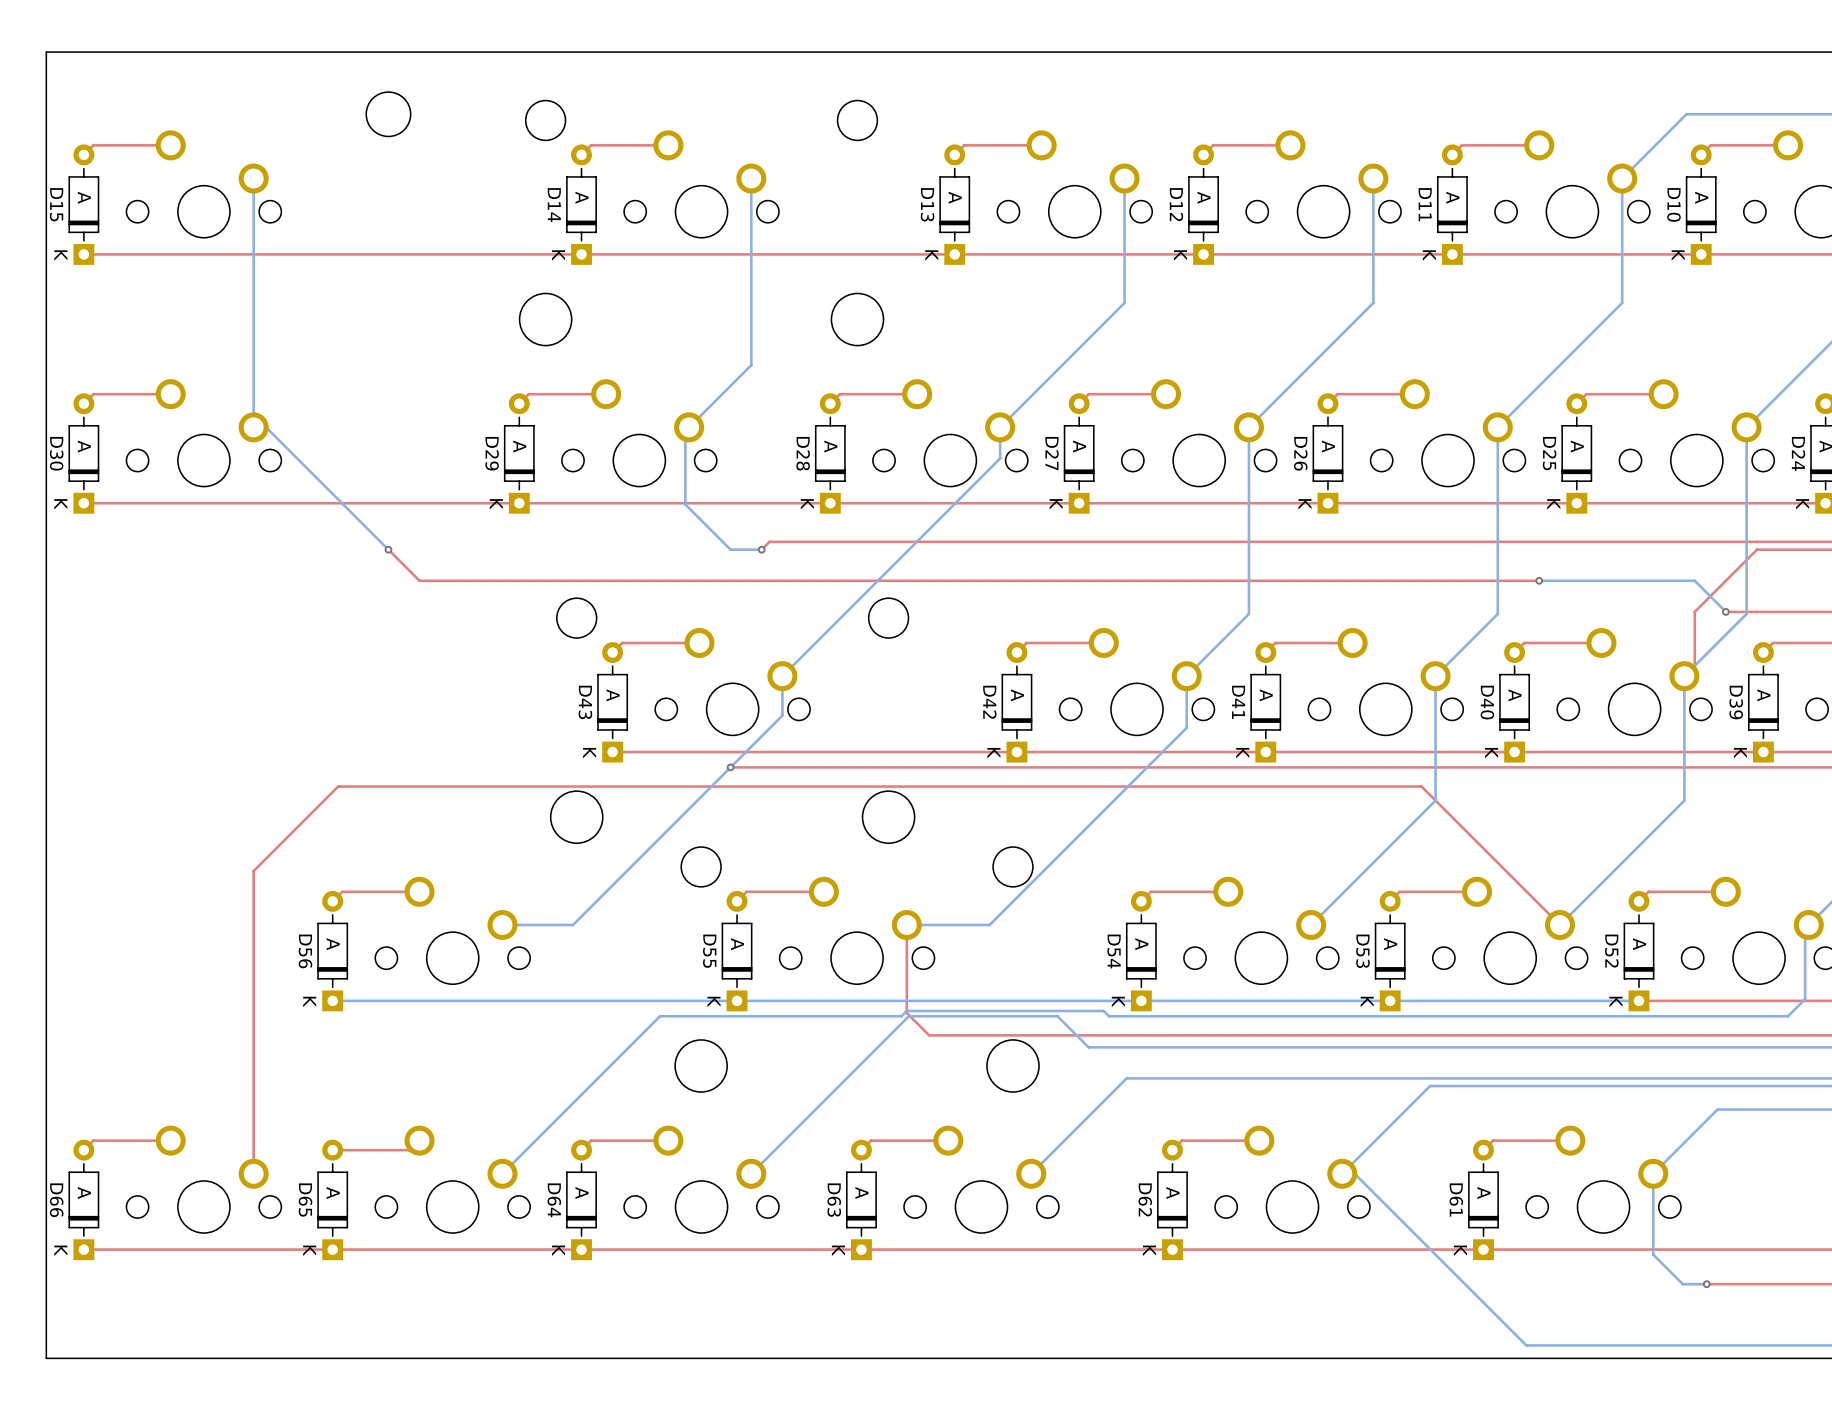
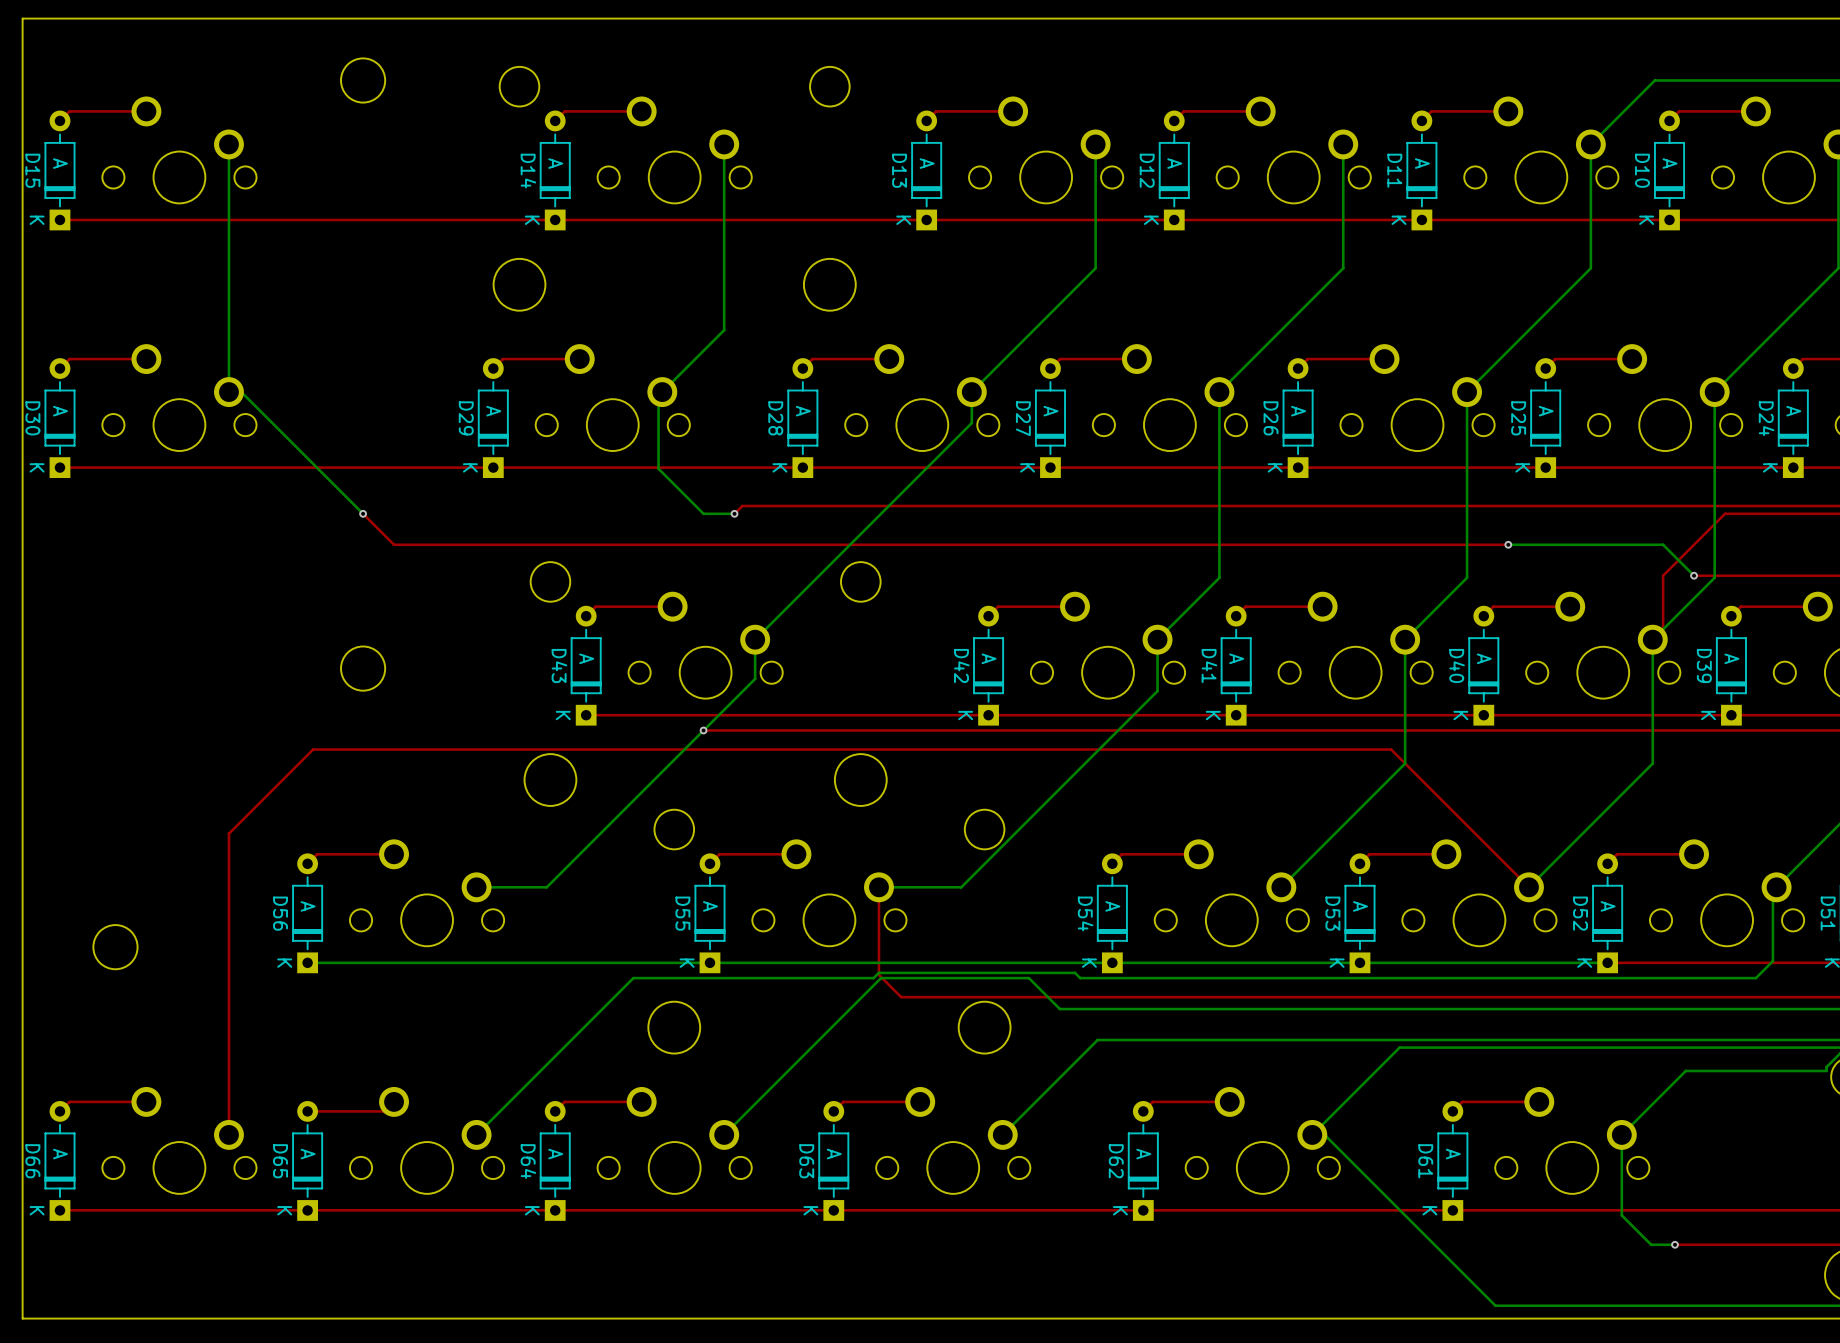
round board edge: none -> [340, 646, 386, 692]
round board edge: none -> [93, 924, 138, 970]

